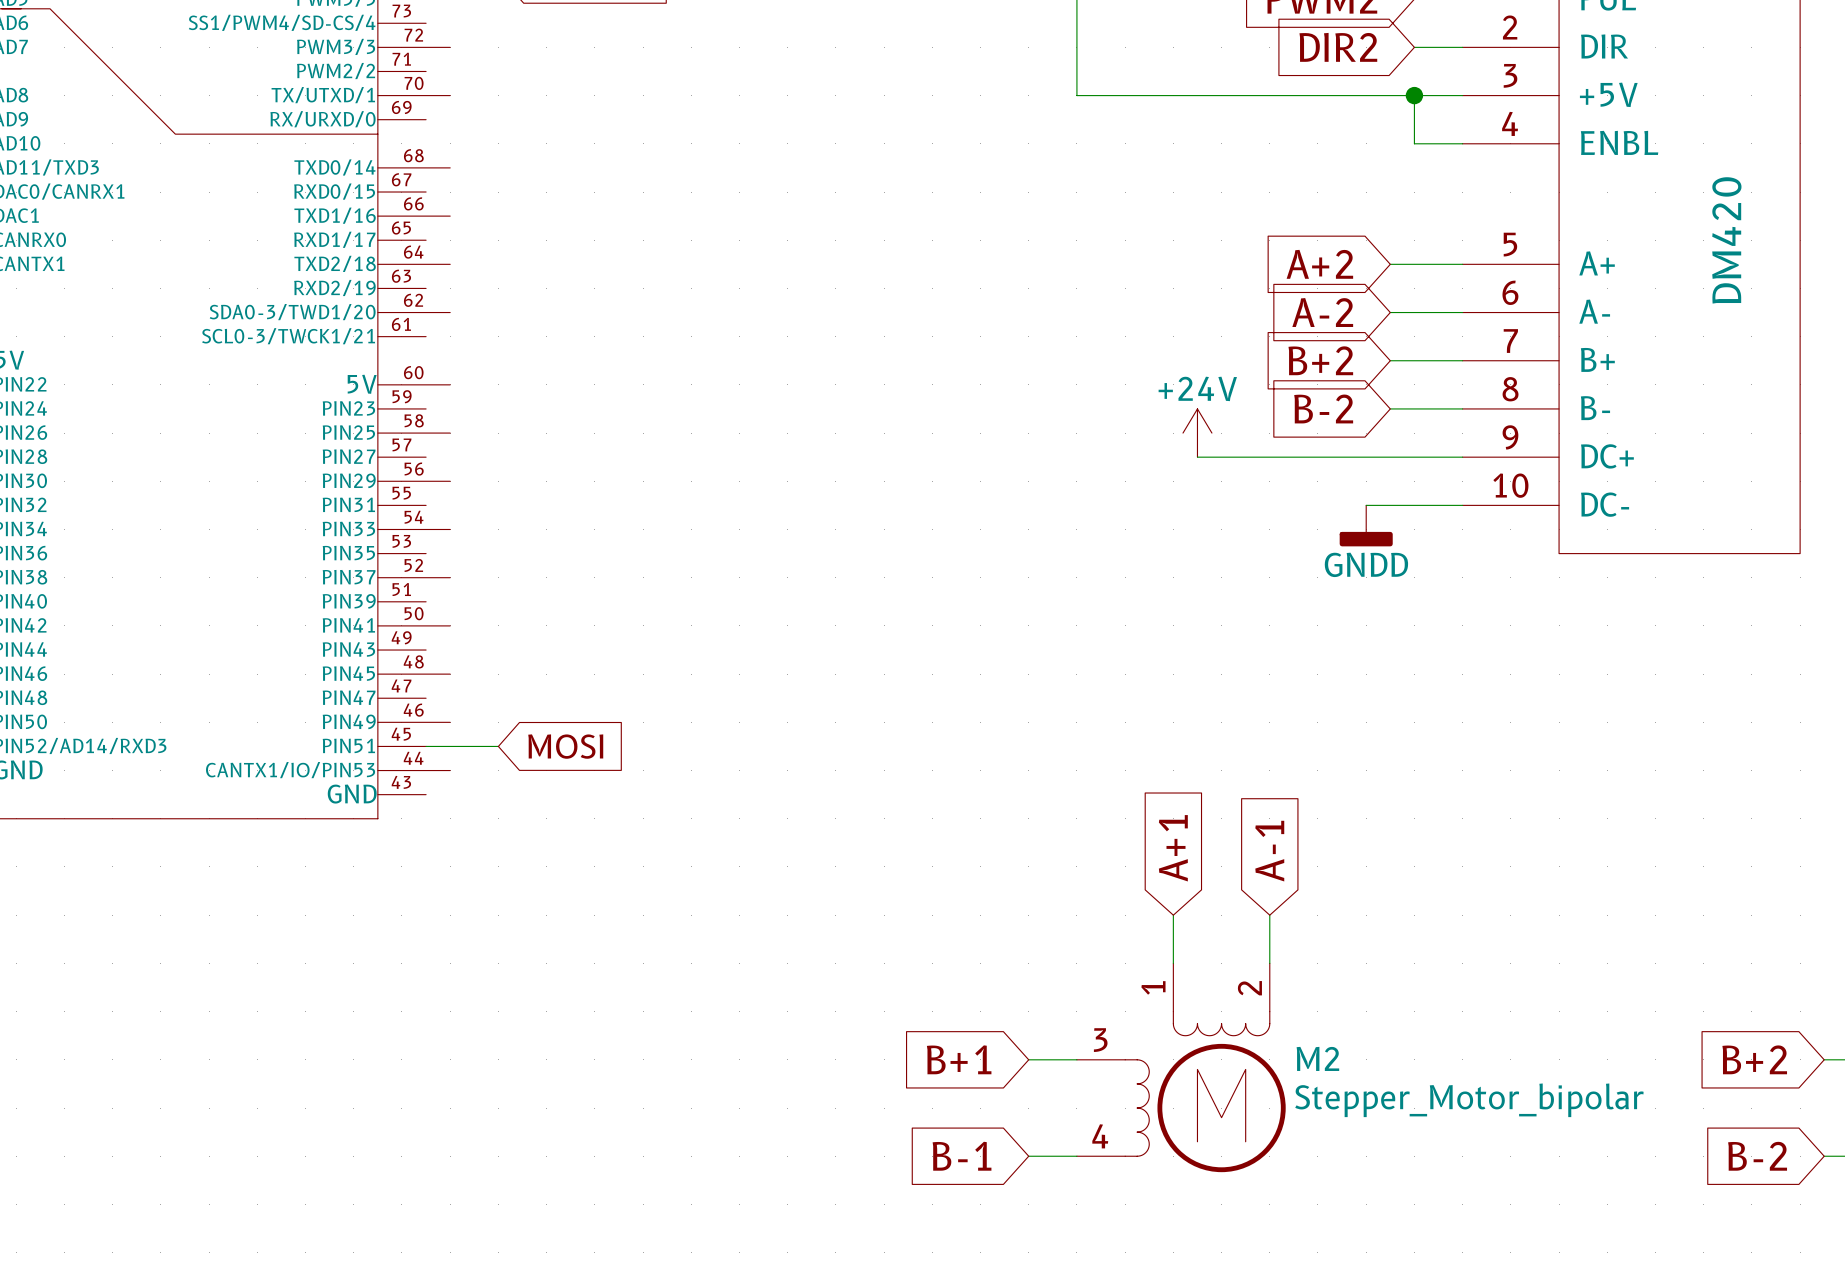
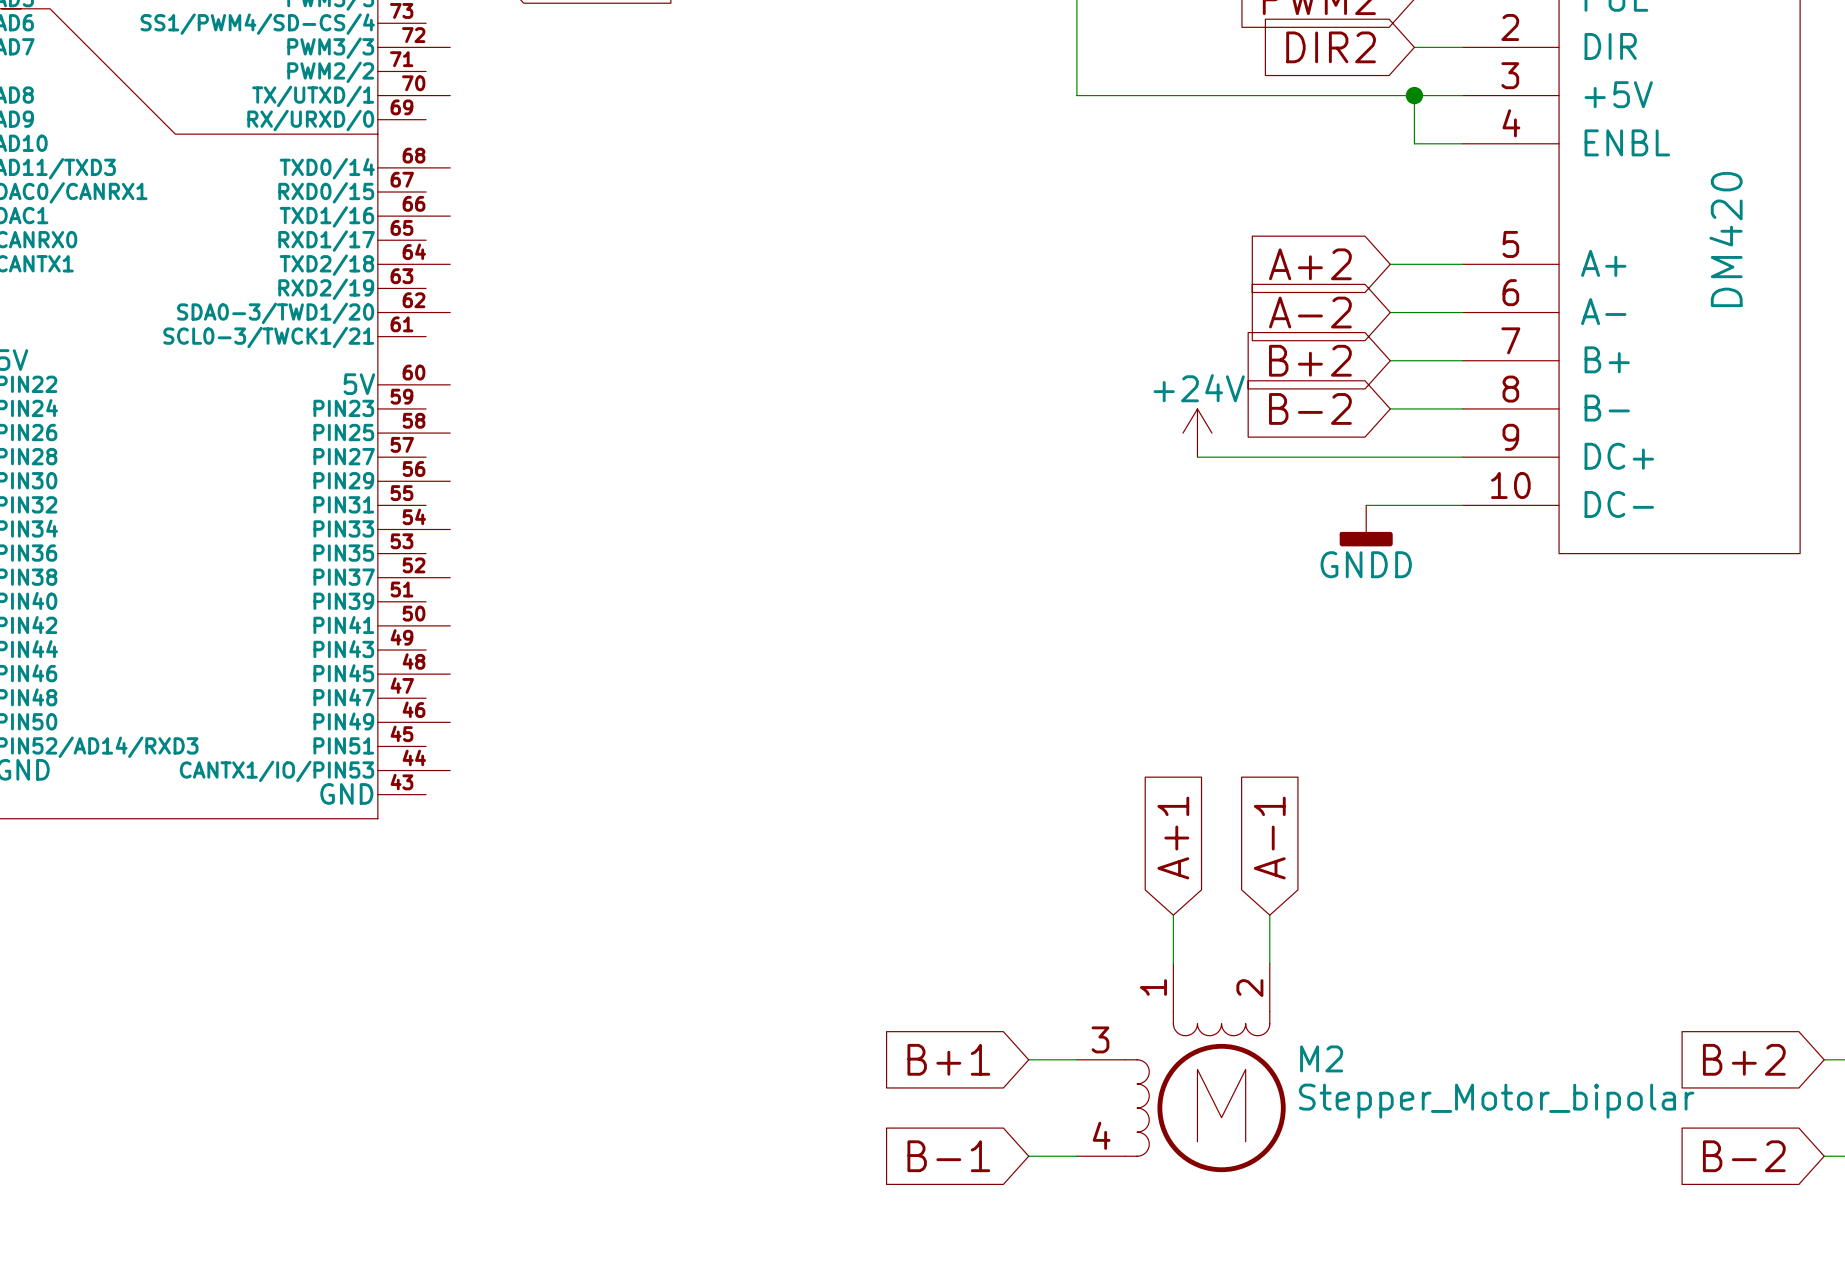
wire: (426, 746) (498, 746) -> none
global label: MOSI (565, 746) -> none

